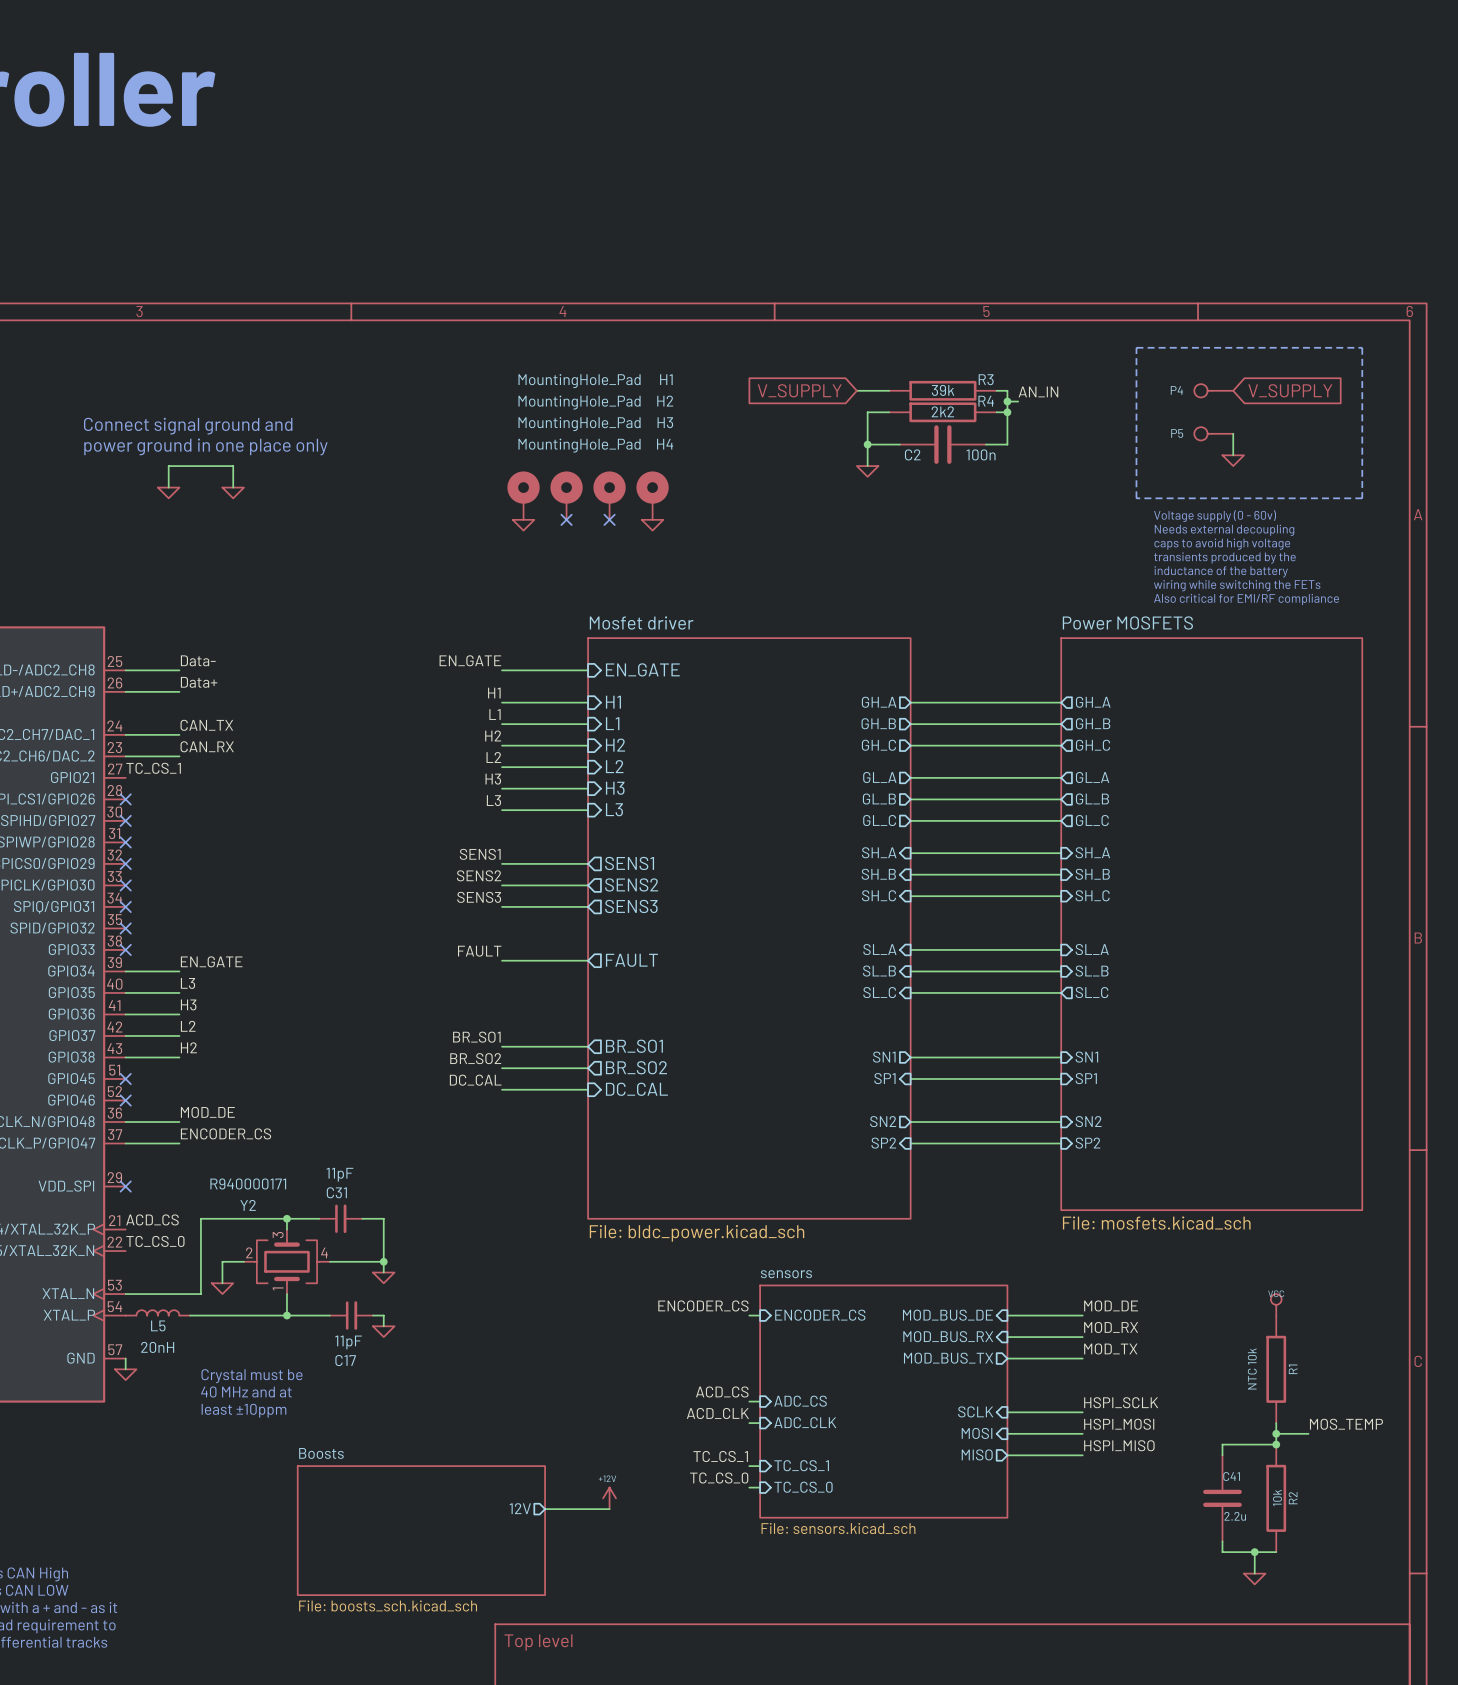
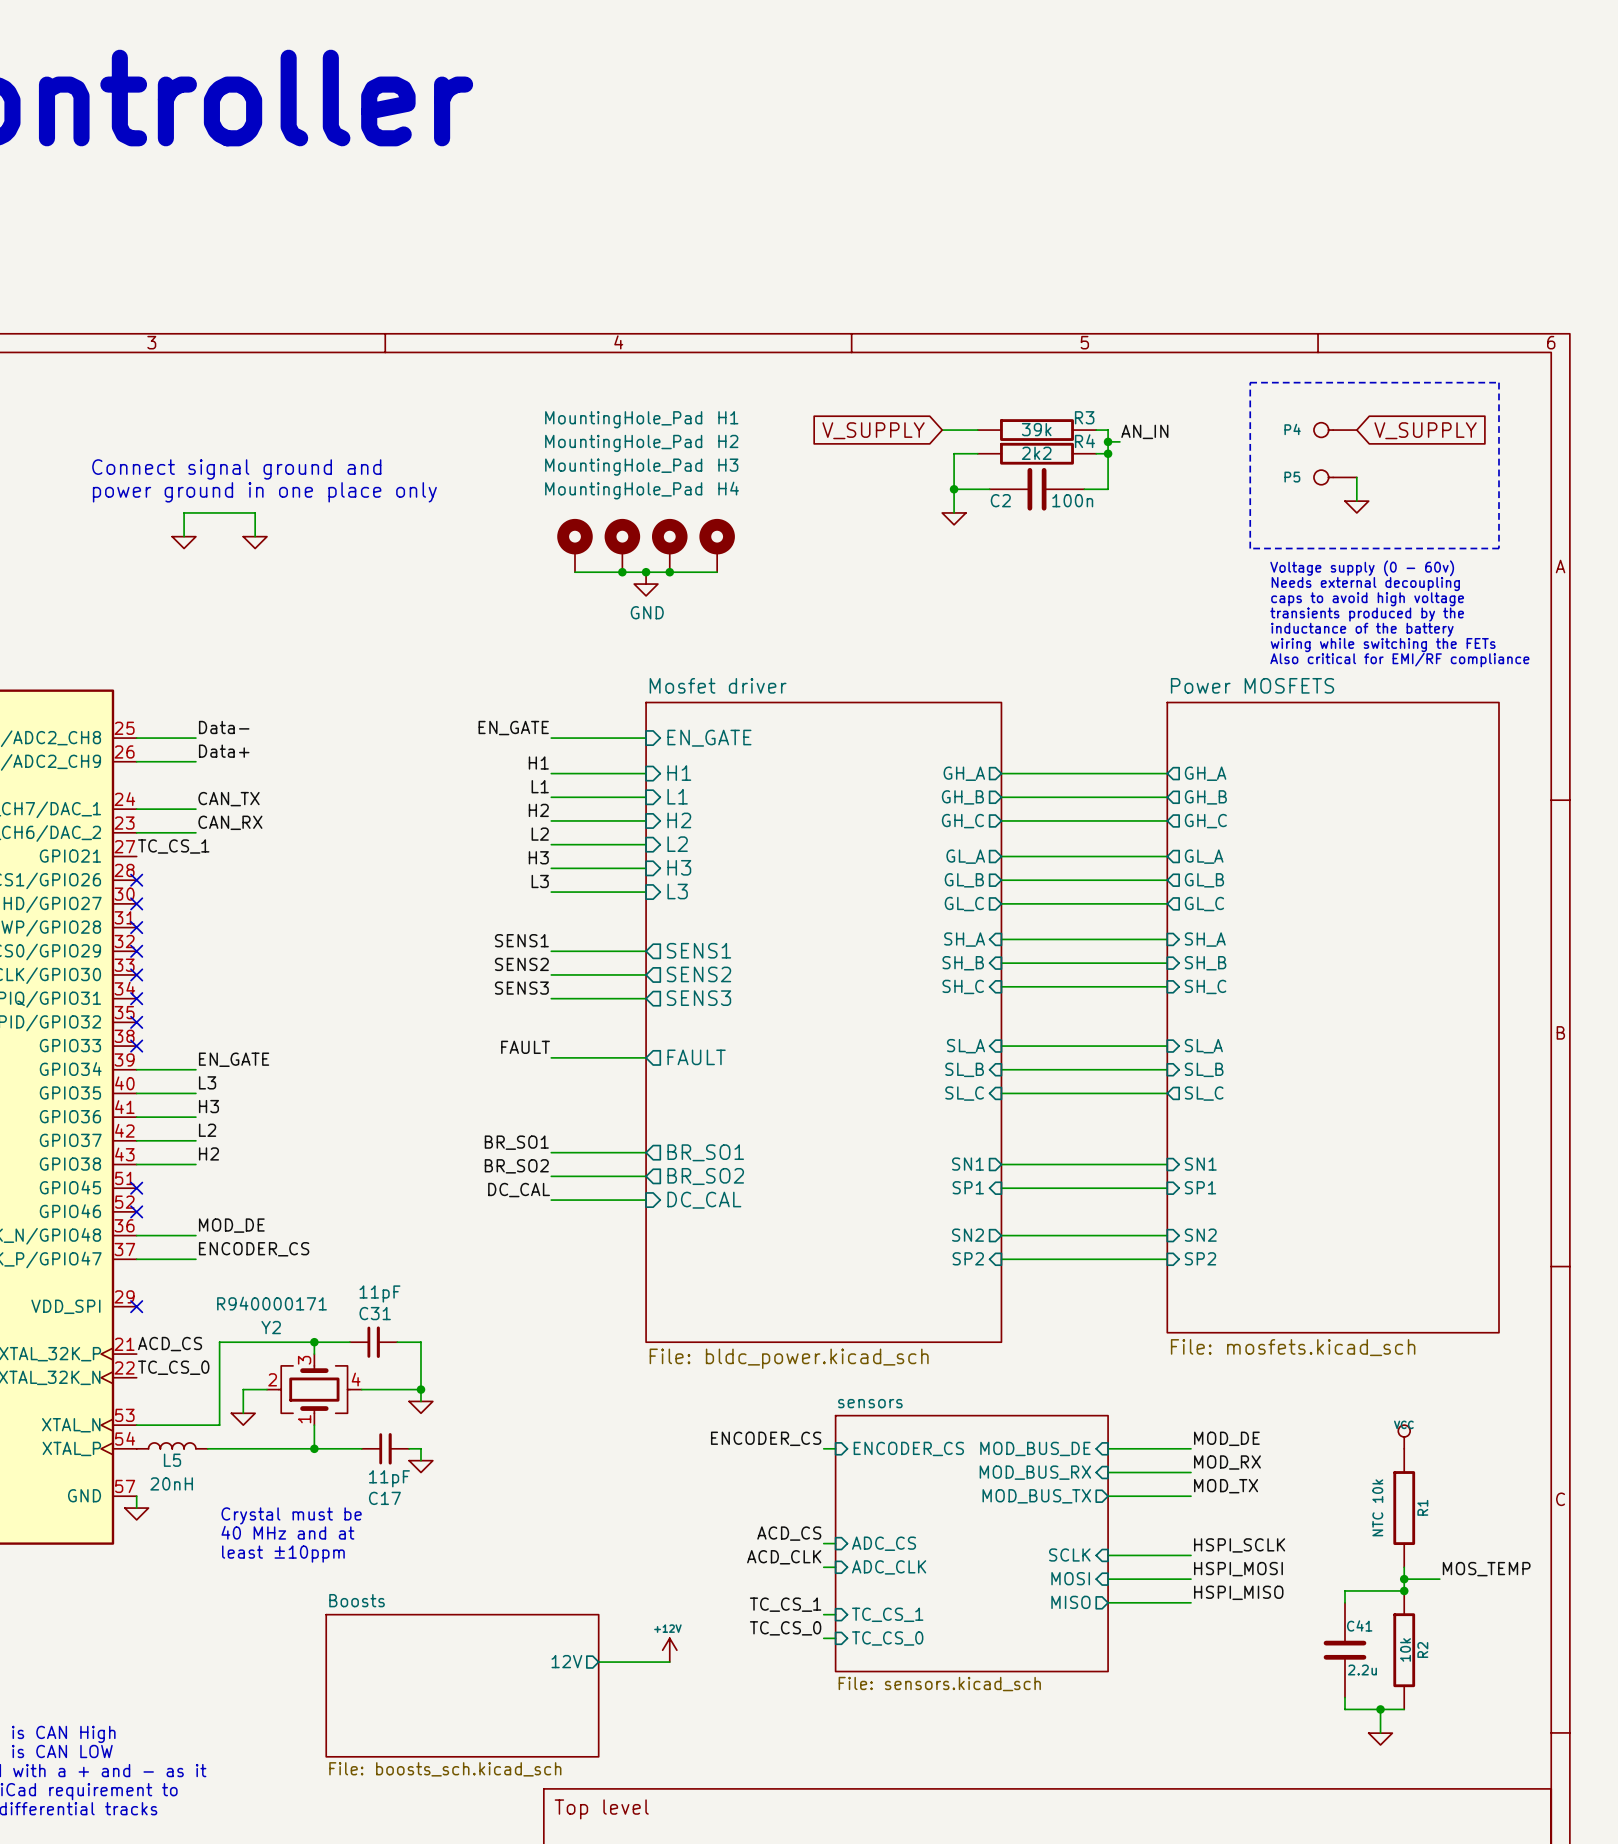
wire: none -> (574, 572) (717, 572)
no-connect mark: (566, 519) -> none
junction: none -> (622, 572)
junction: none -> (646, 572)
no-connect mark: (609, 519) -> none
junction: none -> (669, 572)
power symbol: (523, 525) -> none
power symbol: (652, 525) -> none
power symbol: none -> GND (646, 584)

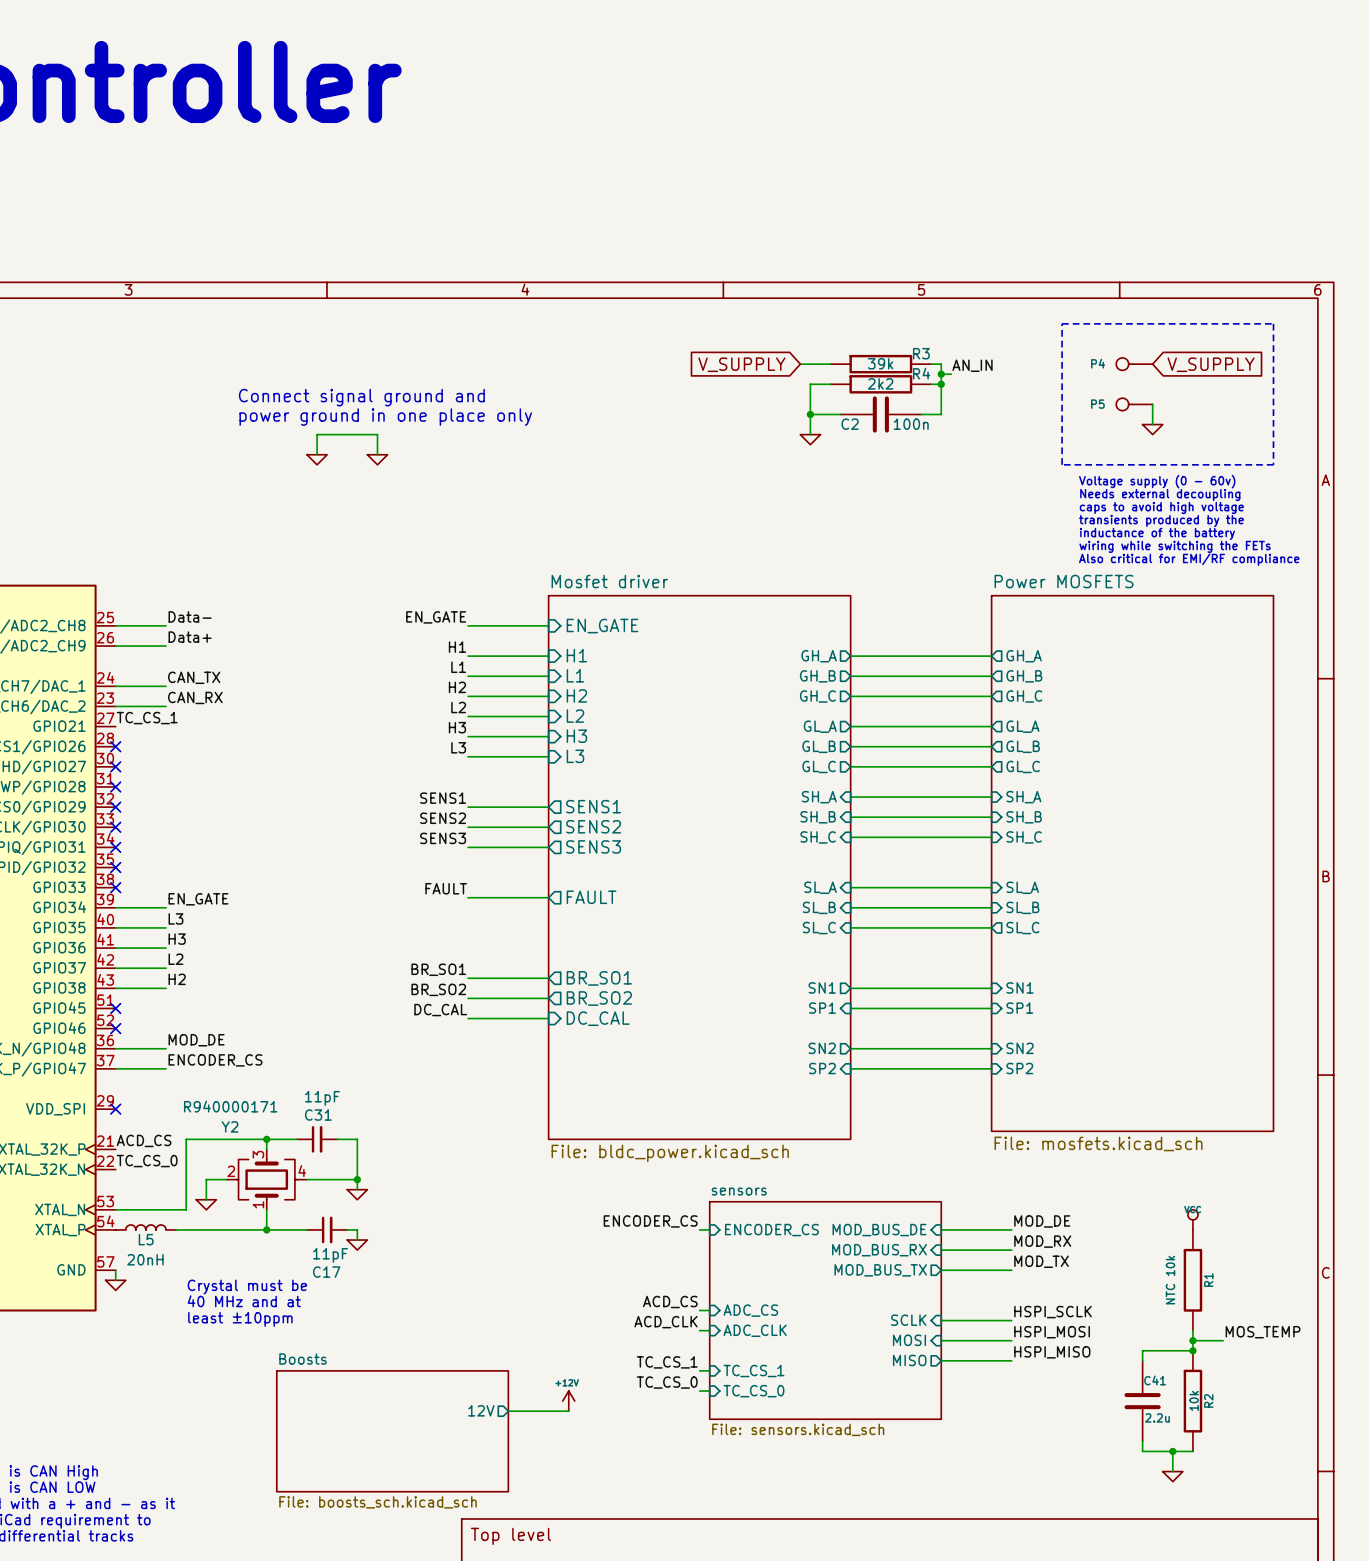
text position: Connect signal ground and (236, 469) -> Connect signal ground and (361, 397)
text position: power ground in one place only (264, 492) -> power ground in one place only (385, 417)
wire: (184, 536) (184, 512) (255, 512) (255, 536) -> (317, 454) (317, 434) (377, 434) (377, 454)
power symbol: (184, 542) -> none
power symbol: (255, 542) -> none
power symbol: none -> (317, 459)
power symbol: none -> (377, 459)
H1: MountingHole_Pad (574, 545) -> none
H2: MountingHole_Pad (622, 545) -> none
H3: MountingHole_Pad (669, 545) -> none
H4: MountingHole_Pad (717, 545) -> none
wire: (574, 572) (717, 572) -> none
junction: (622, 572) -> none
junction: (646, 572) -> none
junction: (669, 572) -> none
power symbol: GND (646, 584) -> none

